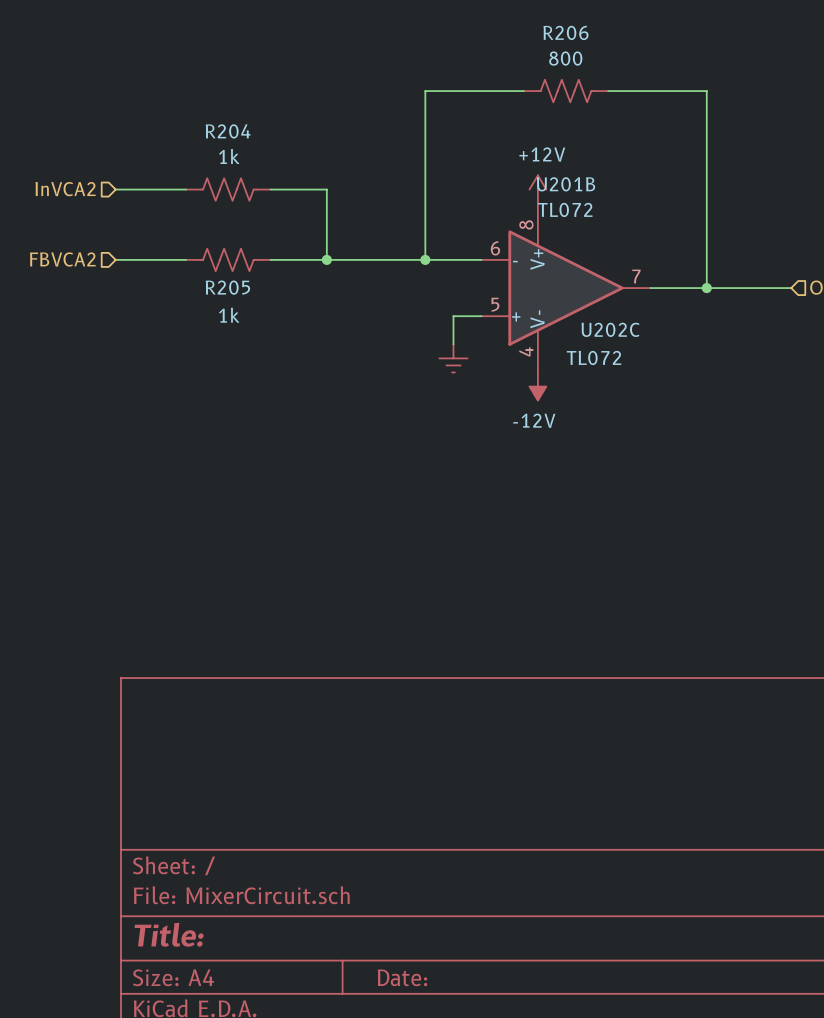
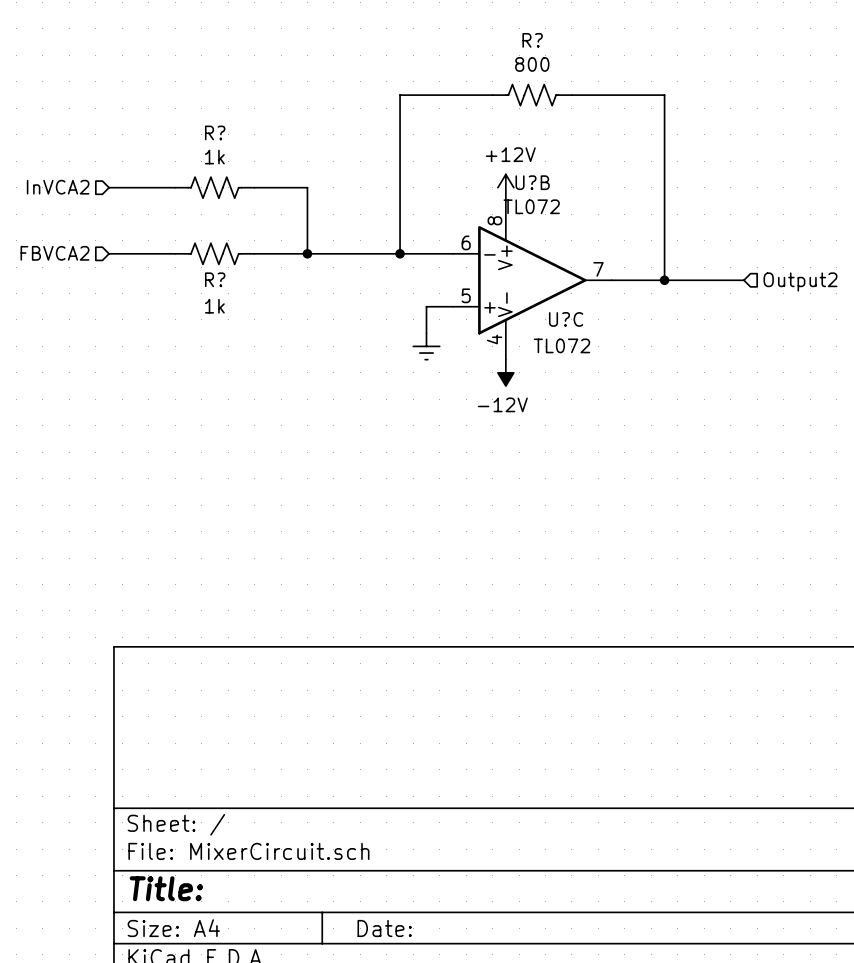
R206 name: R206 (565, 32) -> R? (532, 40)
R204 name: R204 (228, 131) -> R? (215, 132)
U201B name: U201B (566, 184) -> U?B (532, 182)
R205 name: R205 (227, 287) -> R? (215, 279)
U202C name: U202C (610, 329) -> U?C (566, 319)

